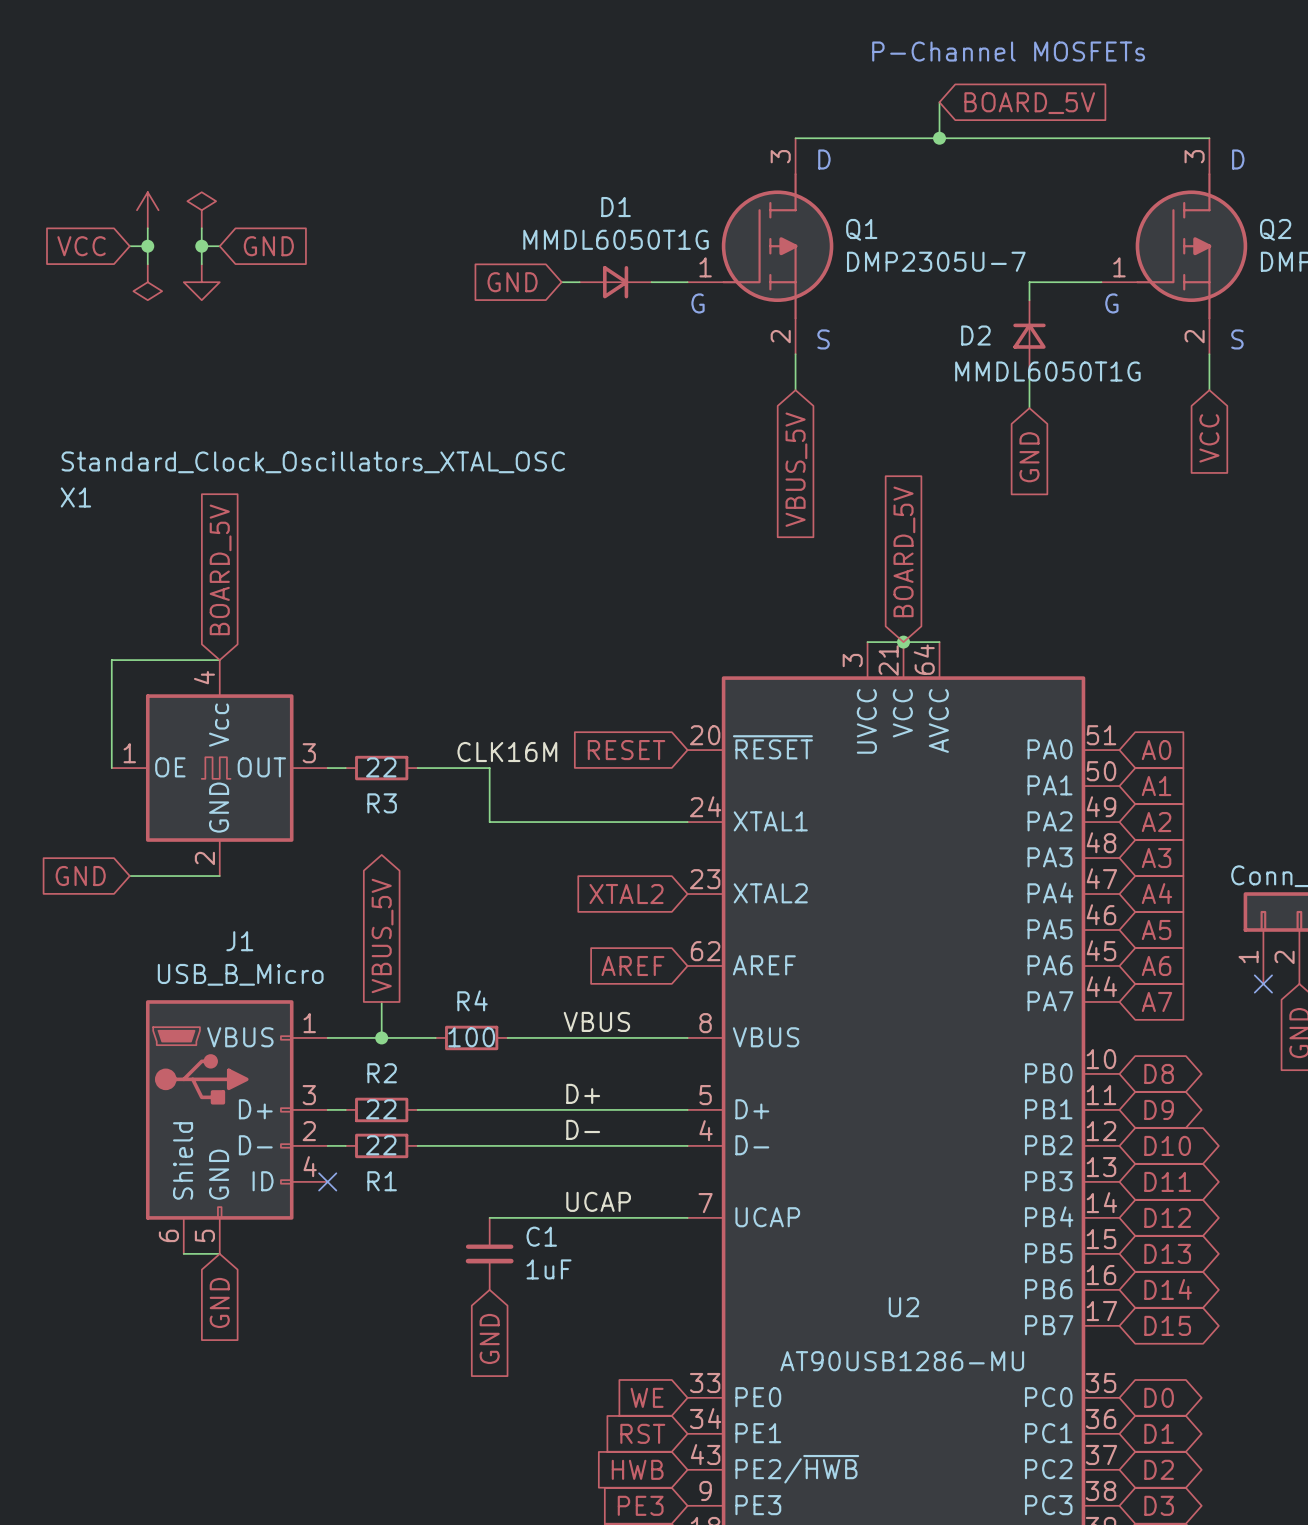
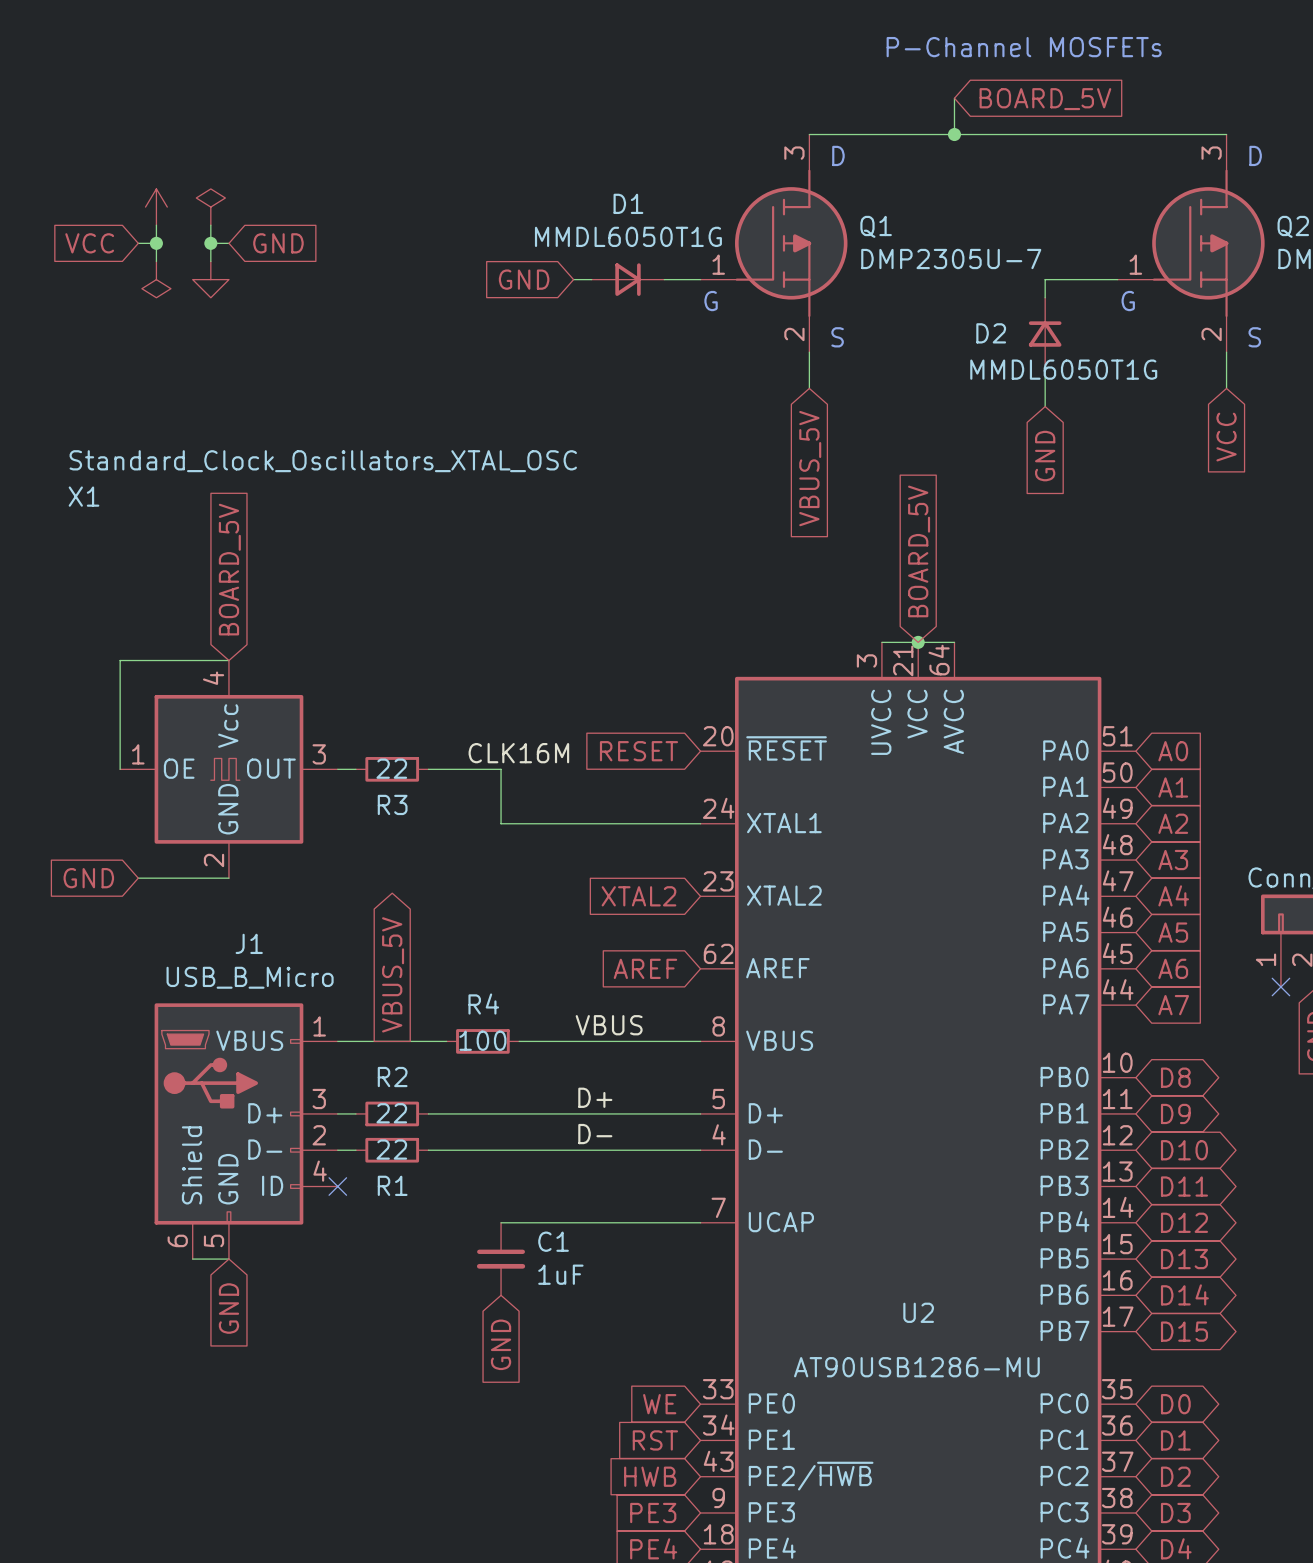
global label position: VBUS_5V (382, 935) -> VBUS_5V (393, 974)
wire: (381, 1001) (381, 1037) -> none
junction: (381, 1037) -> none
label: UCAP (598, 1201) -> none

